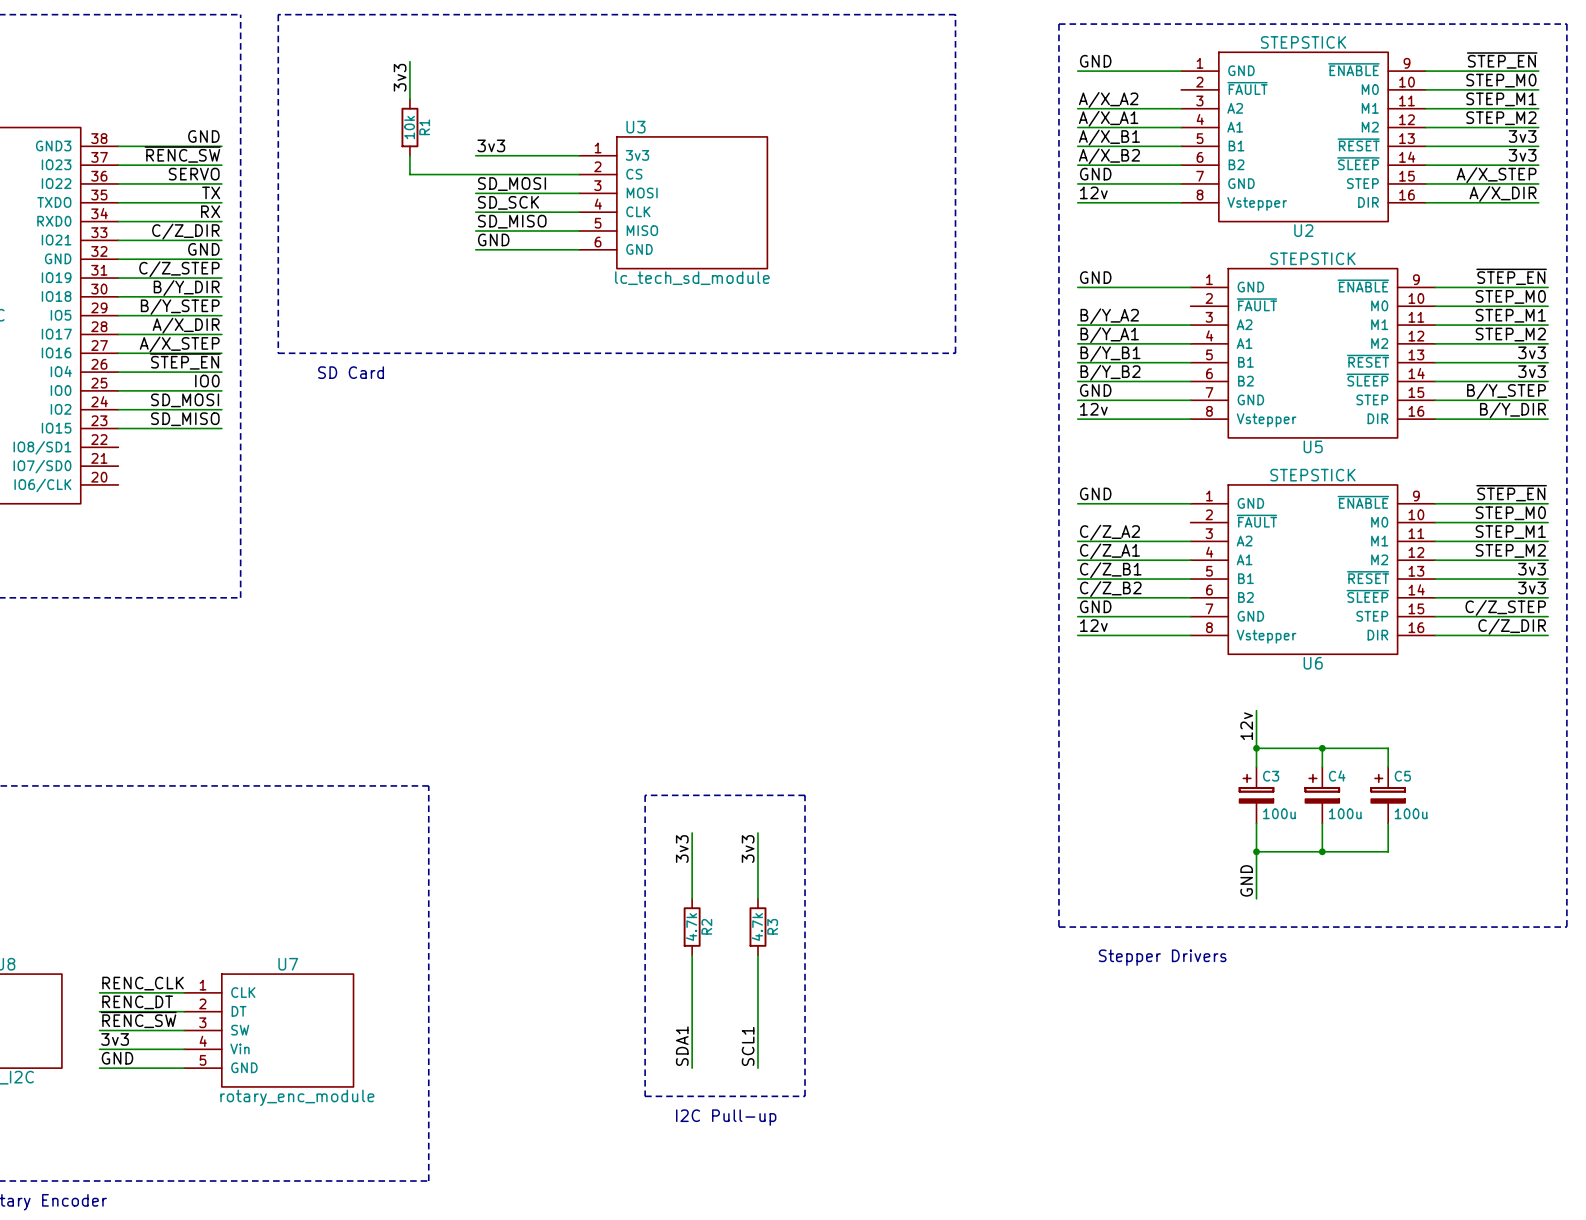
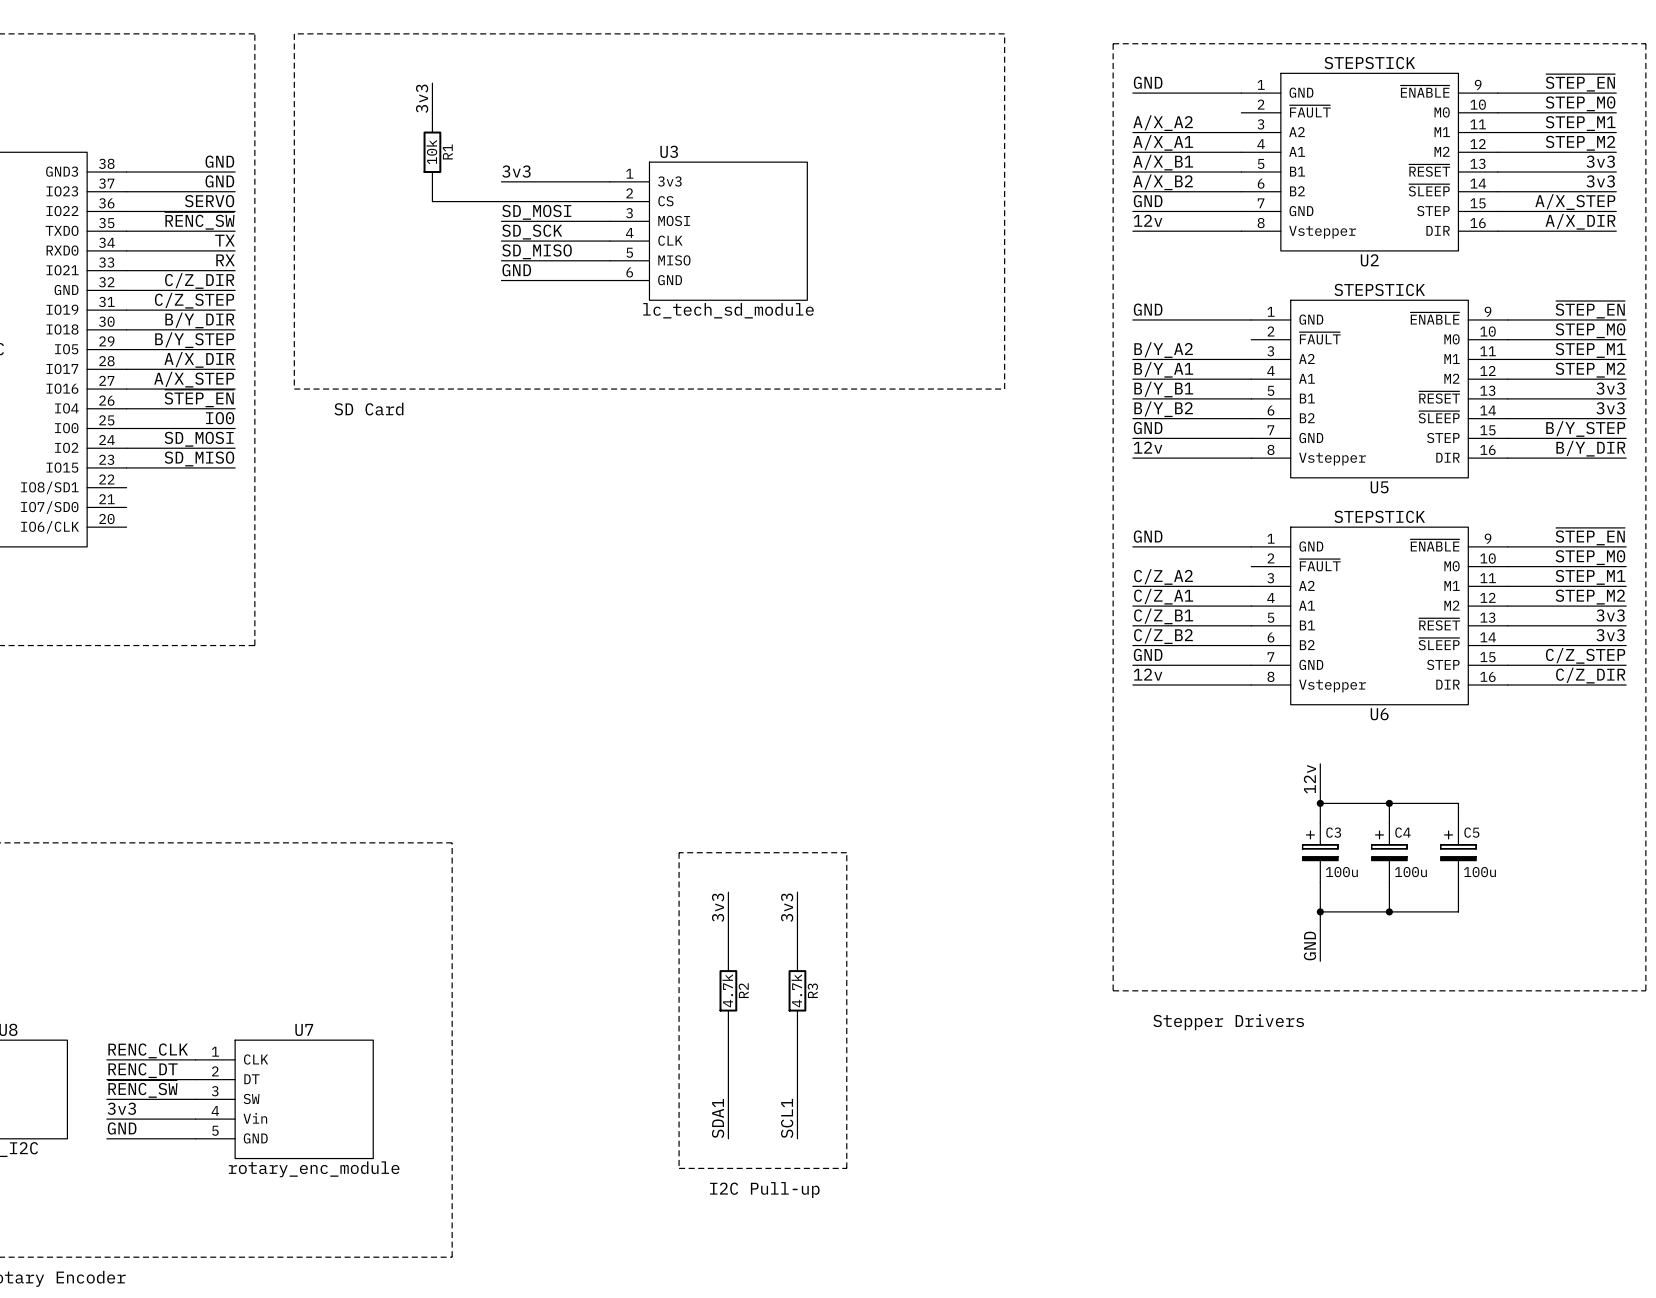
label: ~{RENC_SW} (182, 154) -> GND (219, 181)
label: TX (211, 192) -> ~{RENC_SW} (199, 220)
label: RX (210, 211) -> TX (224, 240)
label: C/Z_DIR (185, 231) -> RX (225, 260)
label: GND (203, 249) -> C/Z_DIR (199, 280)

